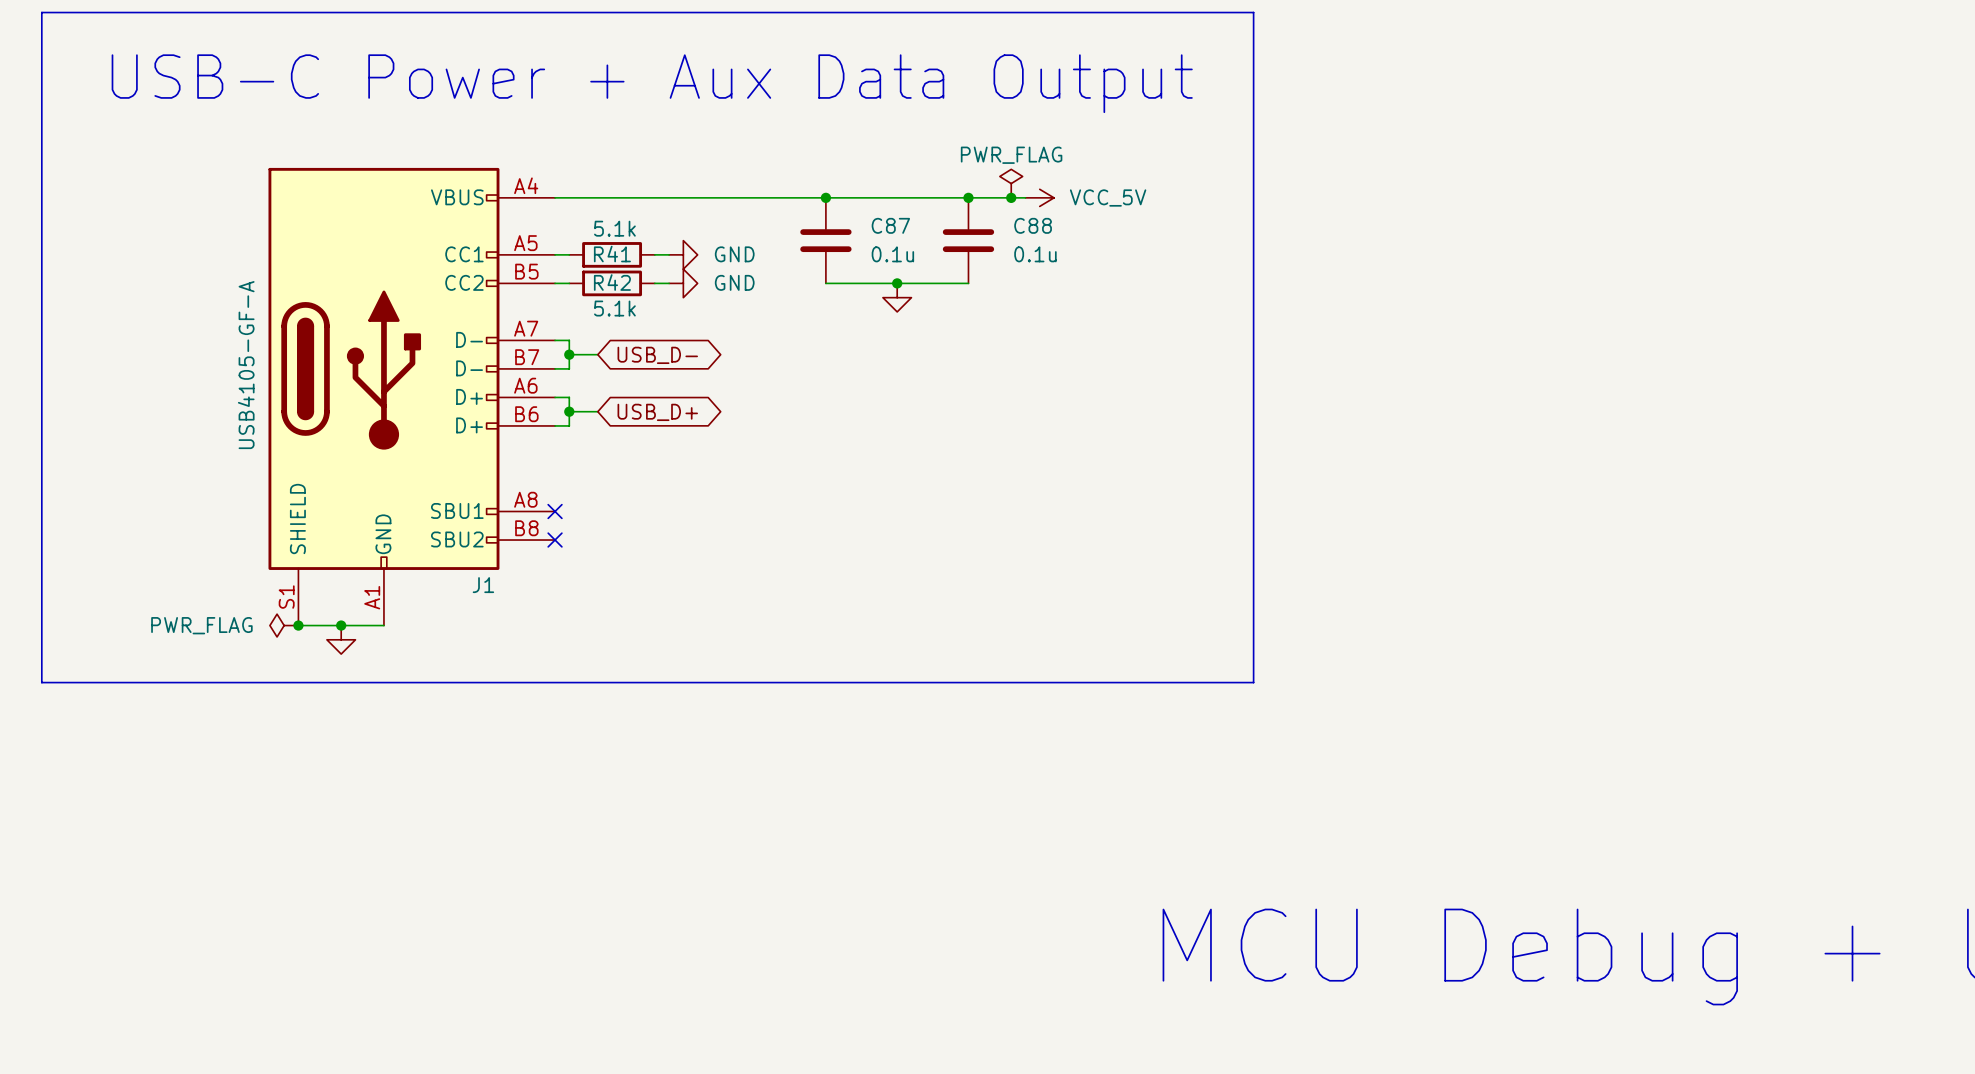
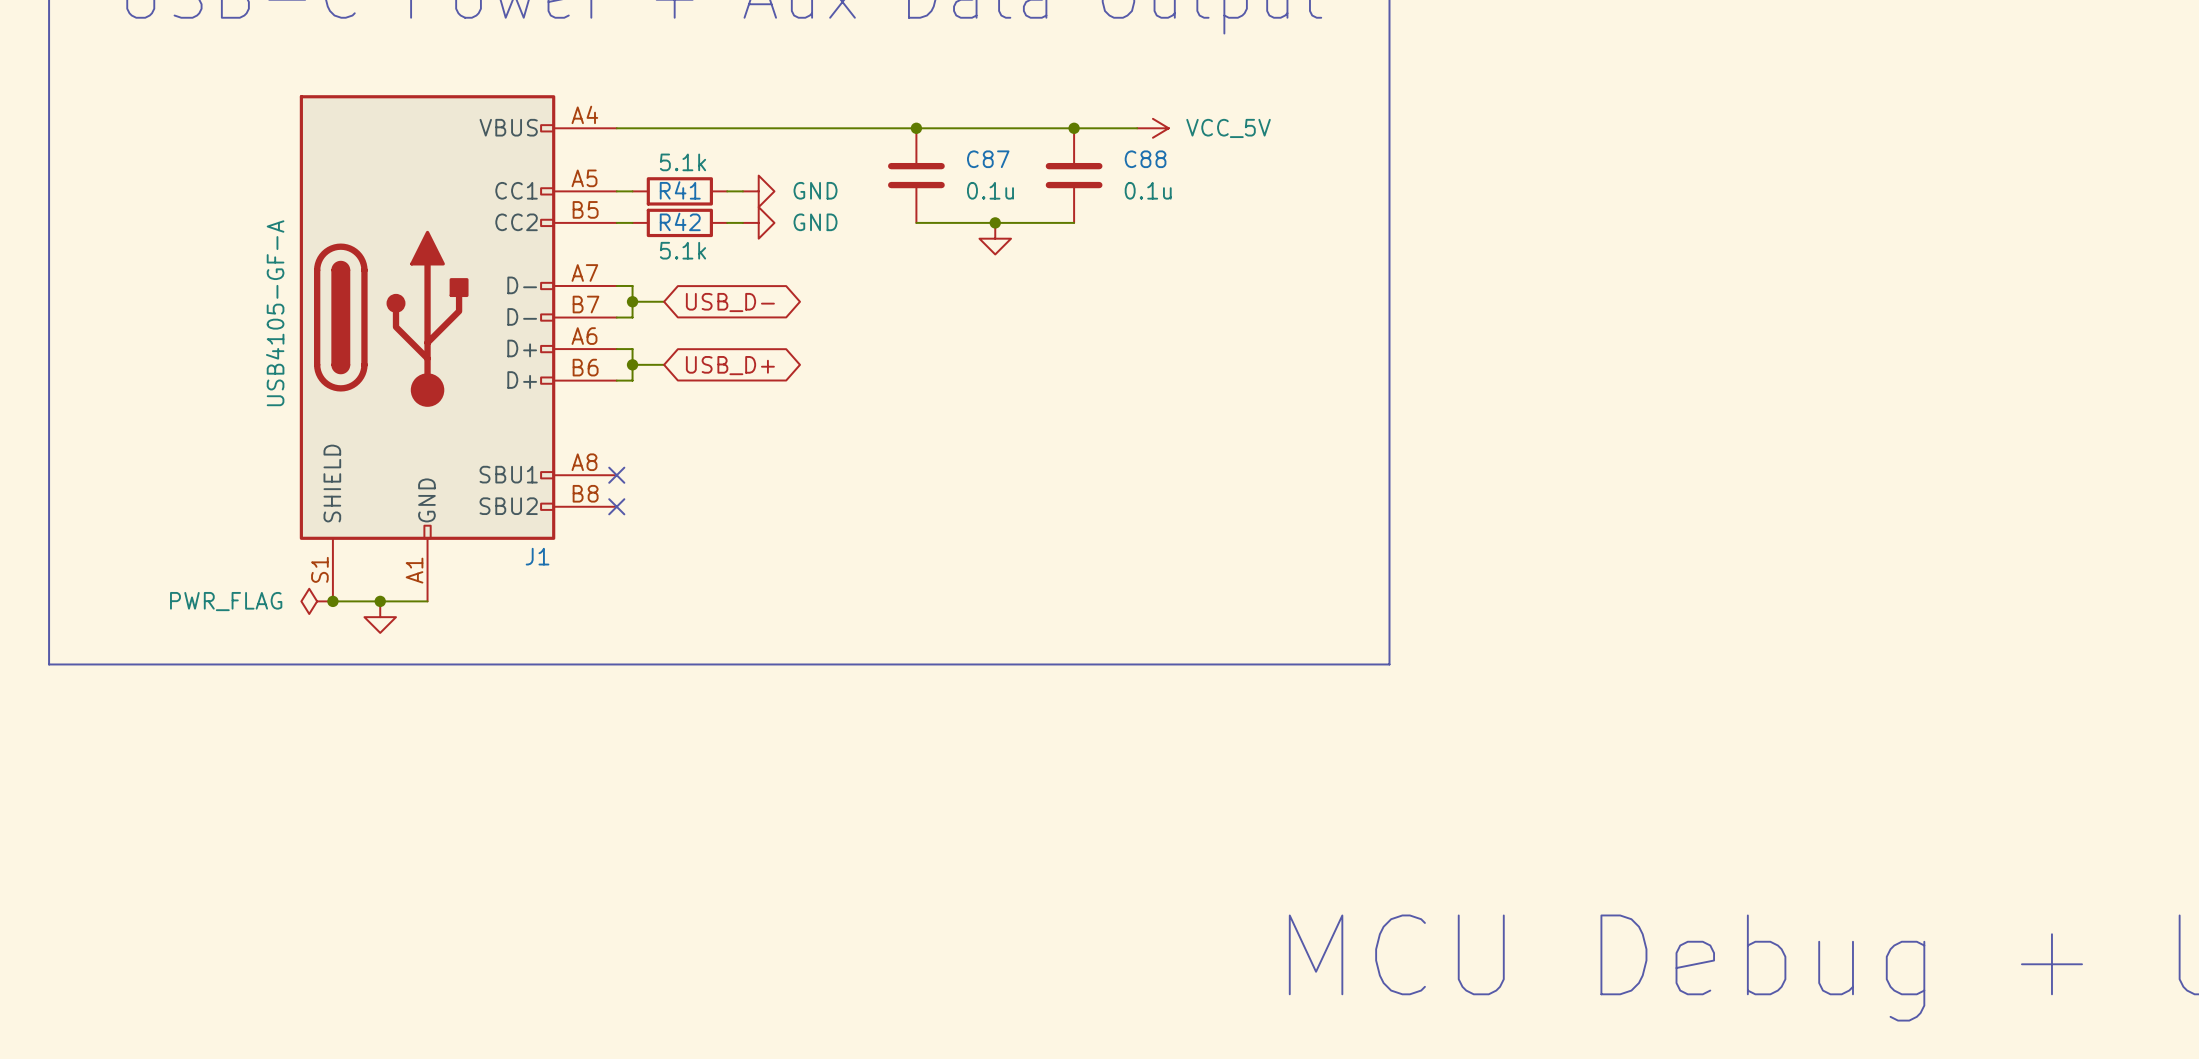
power symbol: PWR_FLAG (1011, 183) -> none
junction: (1011, 197) -> none

